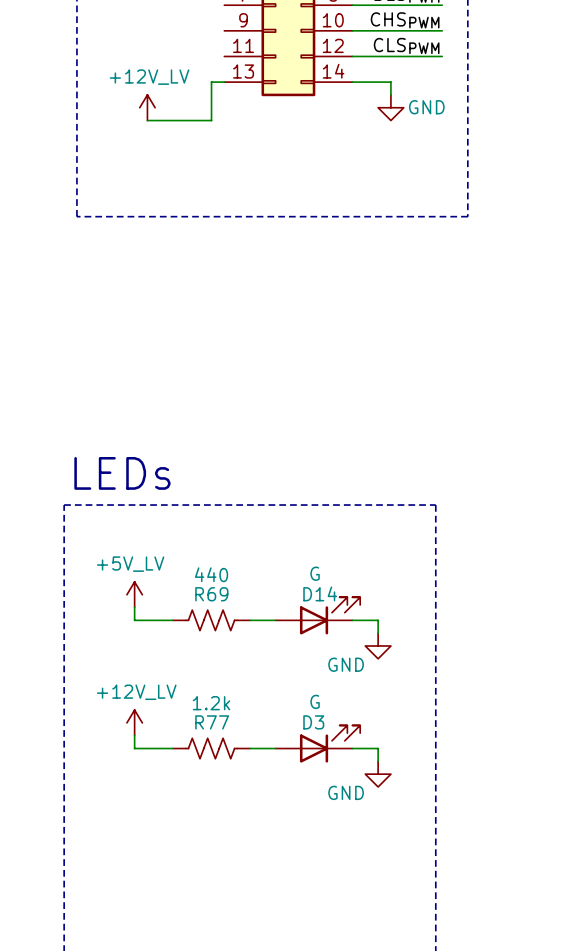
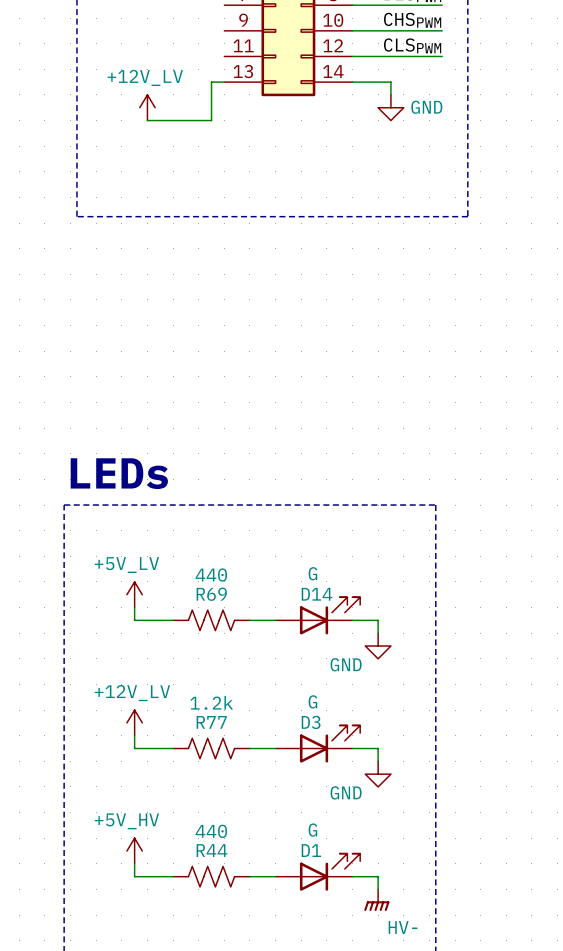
power symbol: none -> +5V_HV (134, 851)
wire: none -> (134, 863) (134, 876) (173, 876)
D1: none -> G (317, 872)
R44: none -> 440 (211, 876)
wire: none -> (249, 876) (275, 876)
wire: none -> (352, 876) (378, 876) (378, 889)
power symbol: none -> HV- (376, 900)

